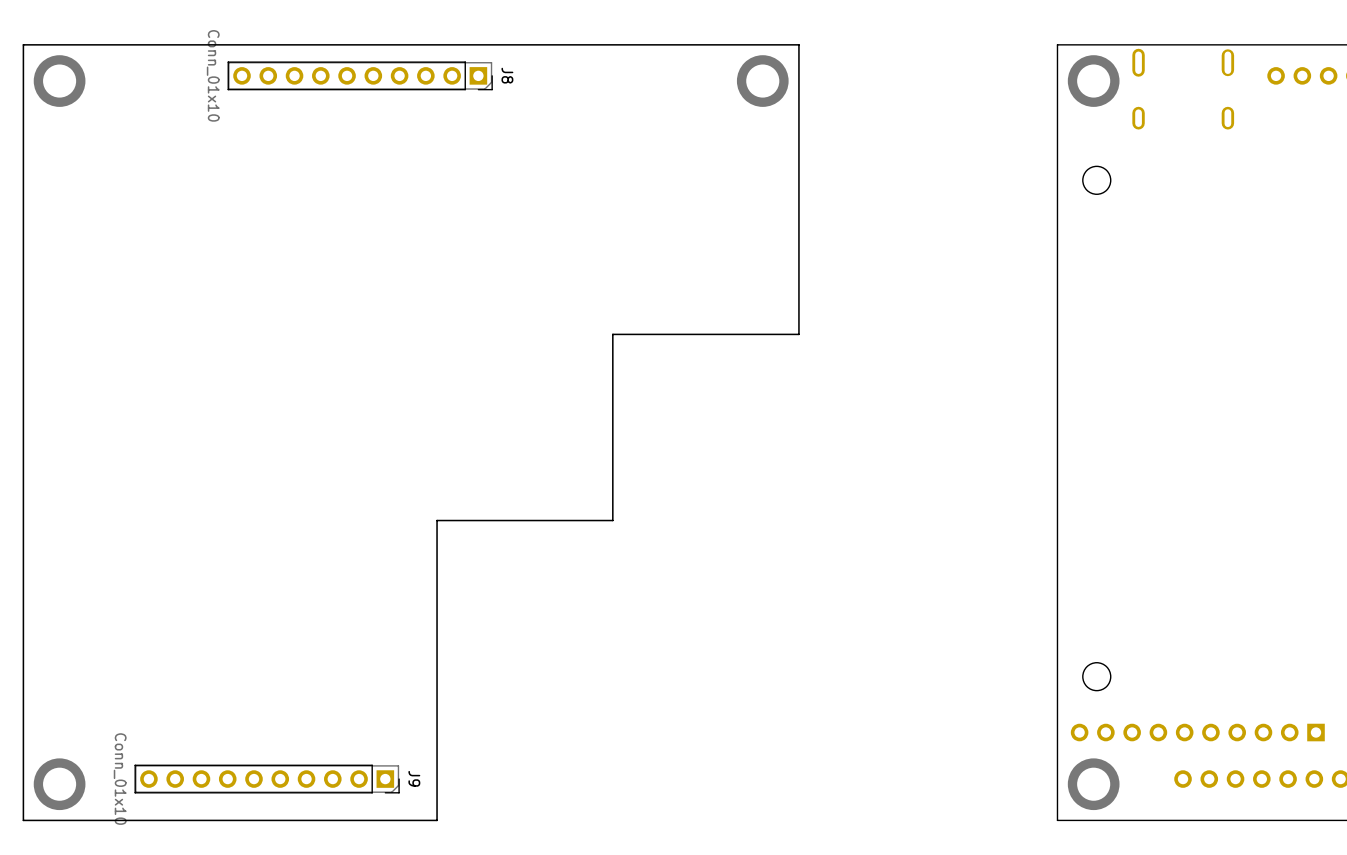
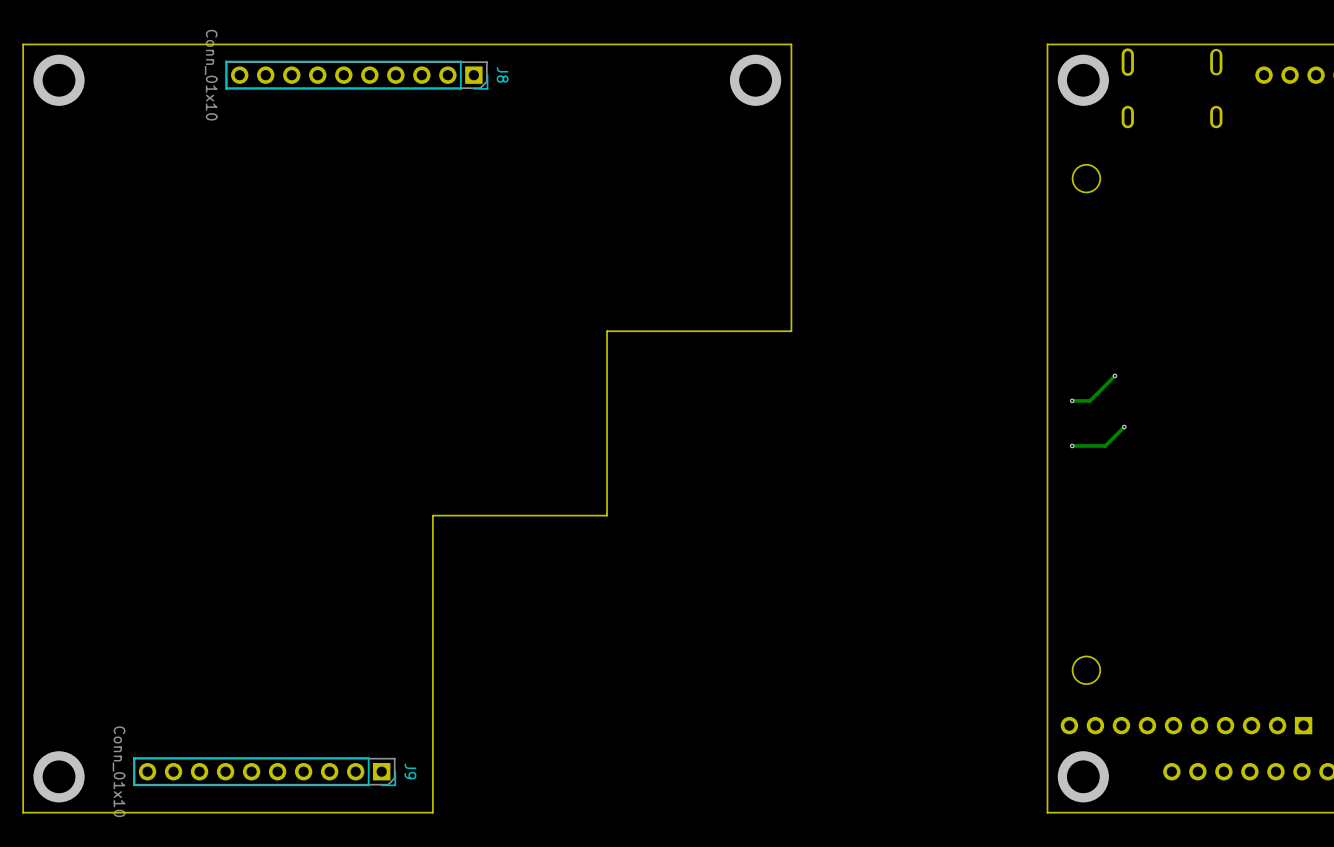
track: none -> (1114, 375) (1090, 400) (1072, 400)
via: none -> (1114, 375)
via: none -> (1072, 400)
track: none -> (1124, 427) (1105, 445) (1072, 445)
via: none -> (1124, 427)
via: none -> (1072, 445)

